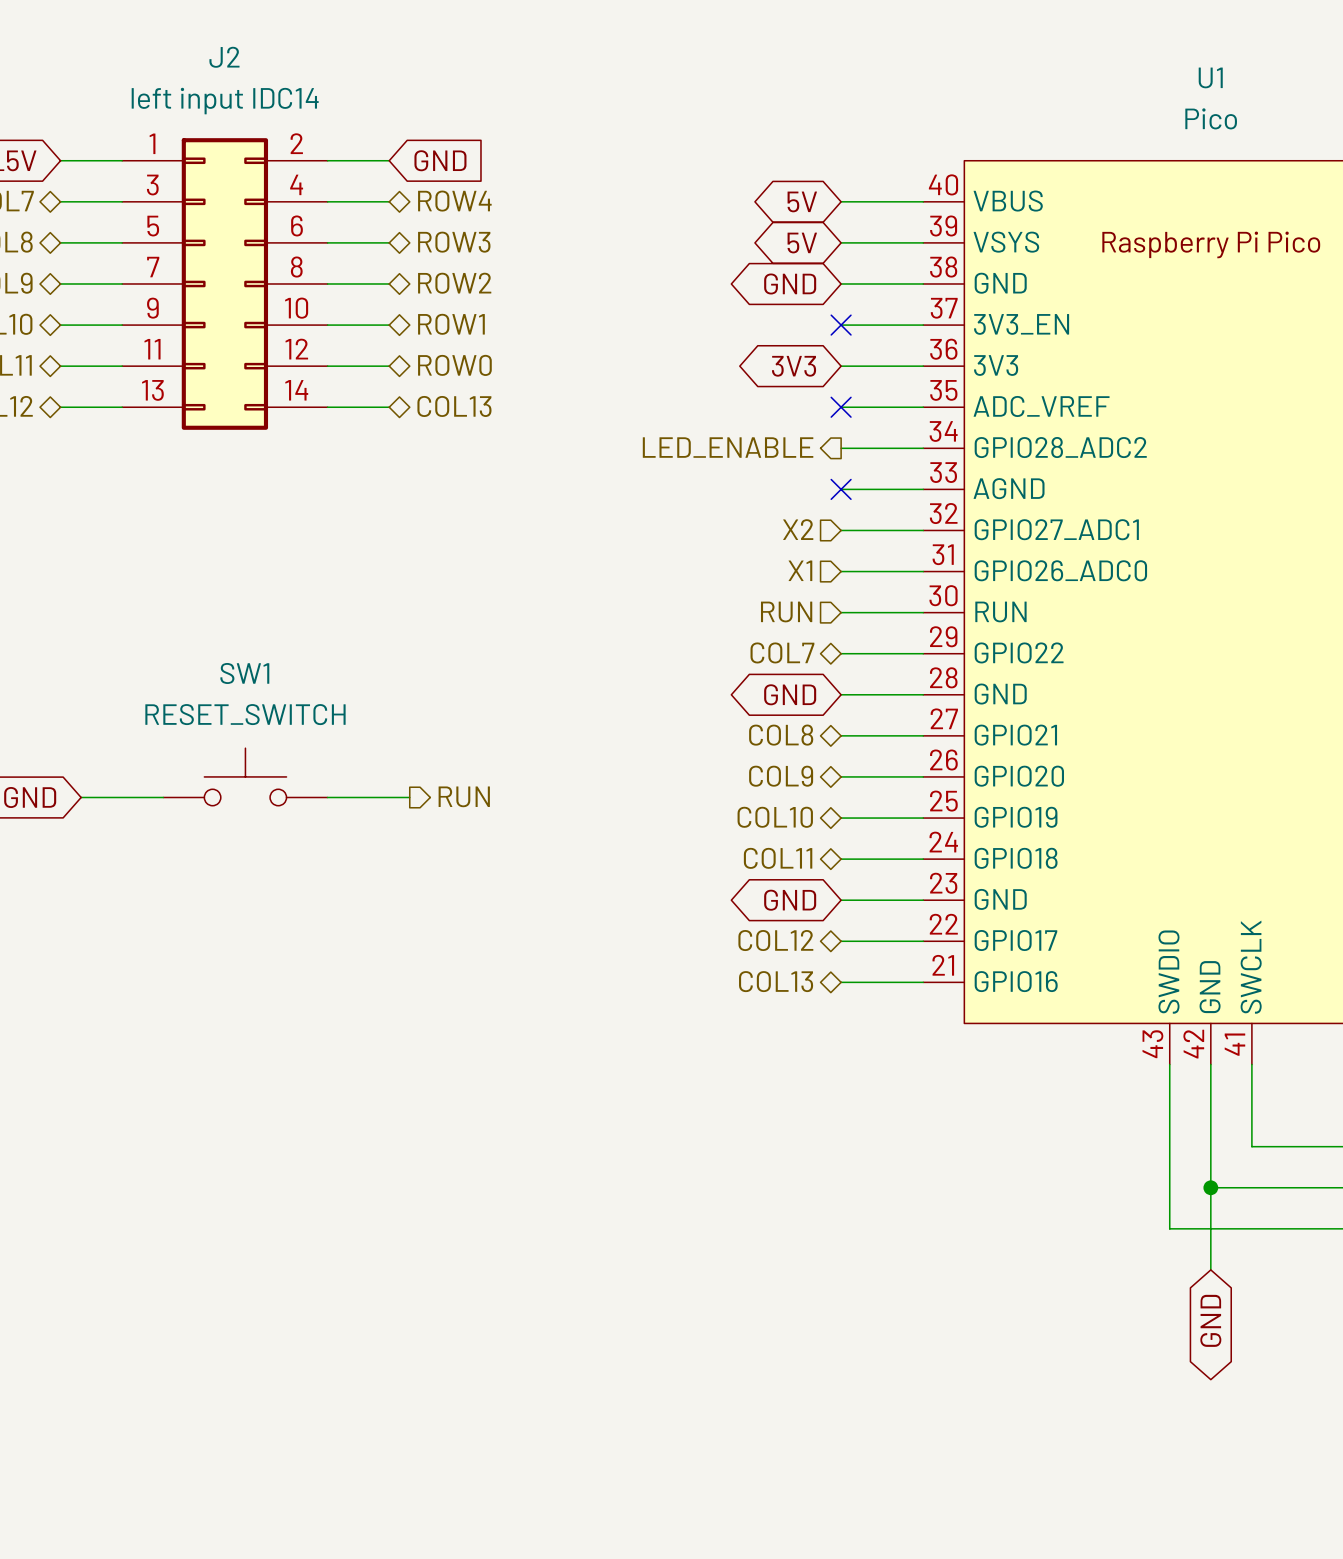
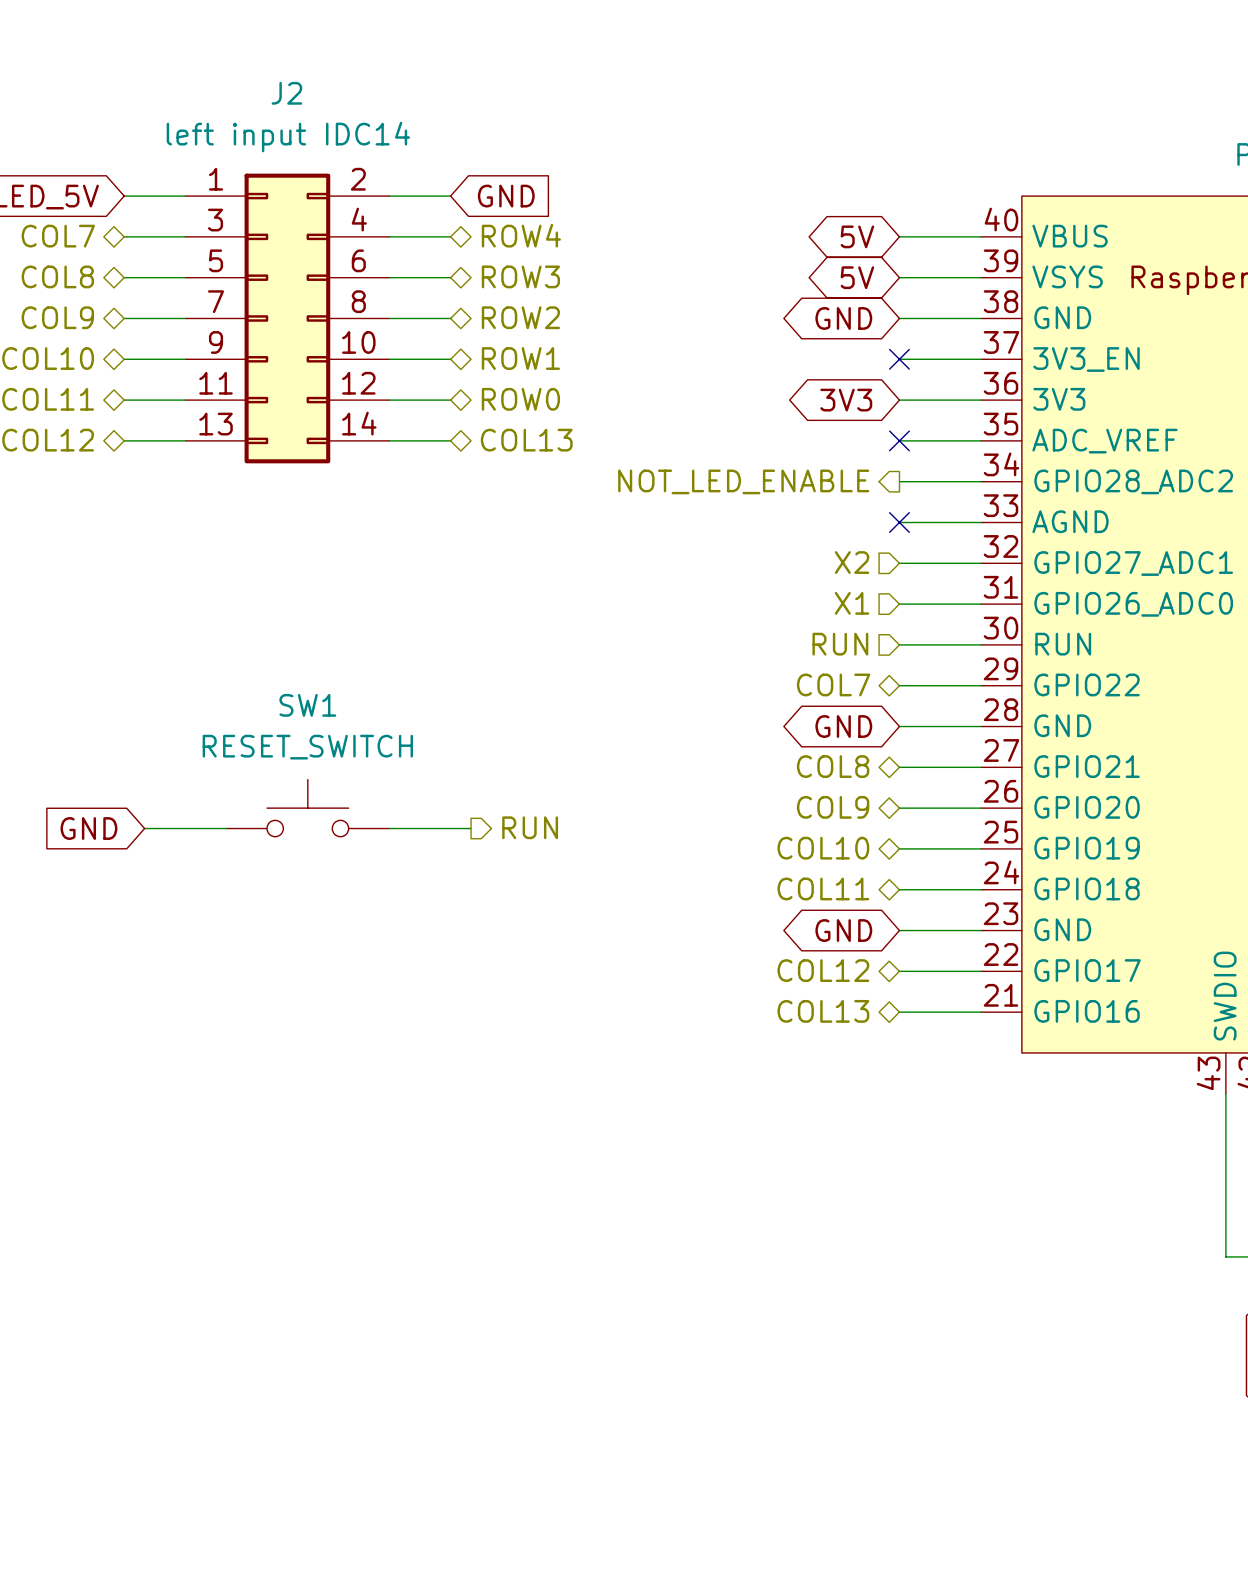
hierarchical label: LED_ENABLE (728, 447) -> NOT_LED_ENABLE (743, 481)

